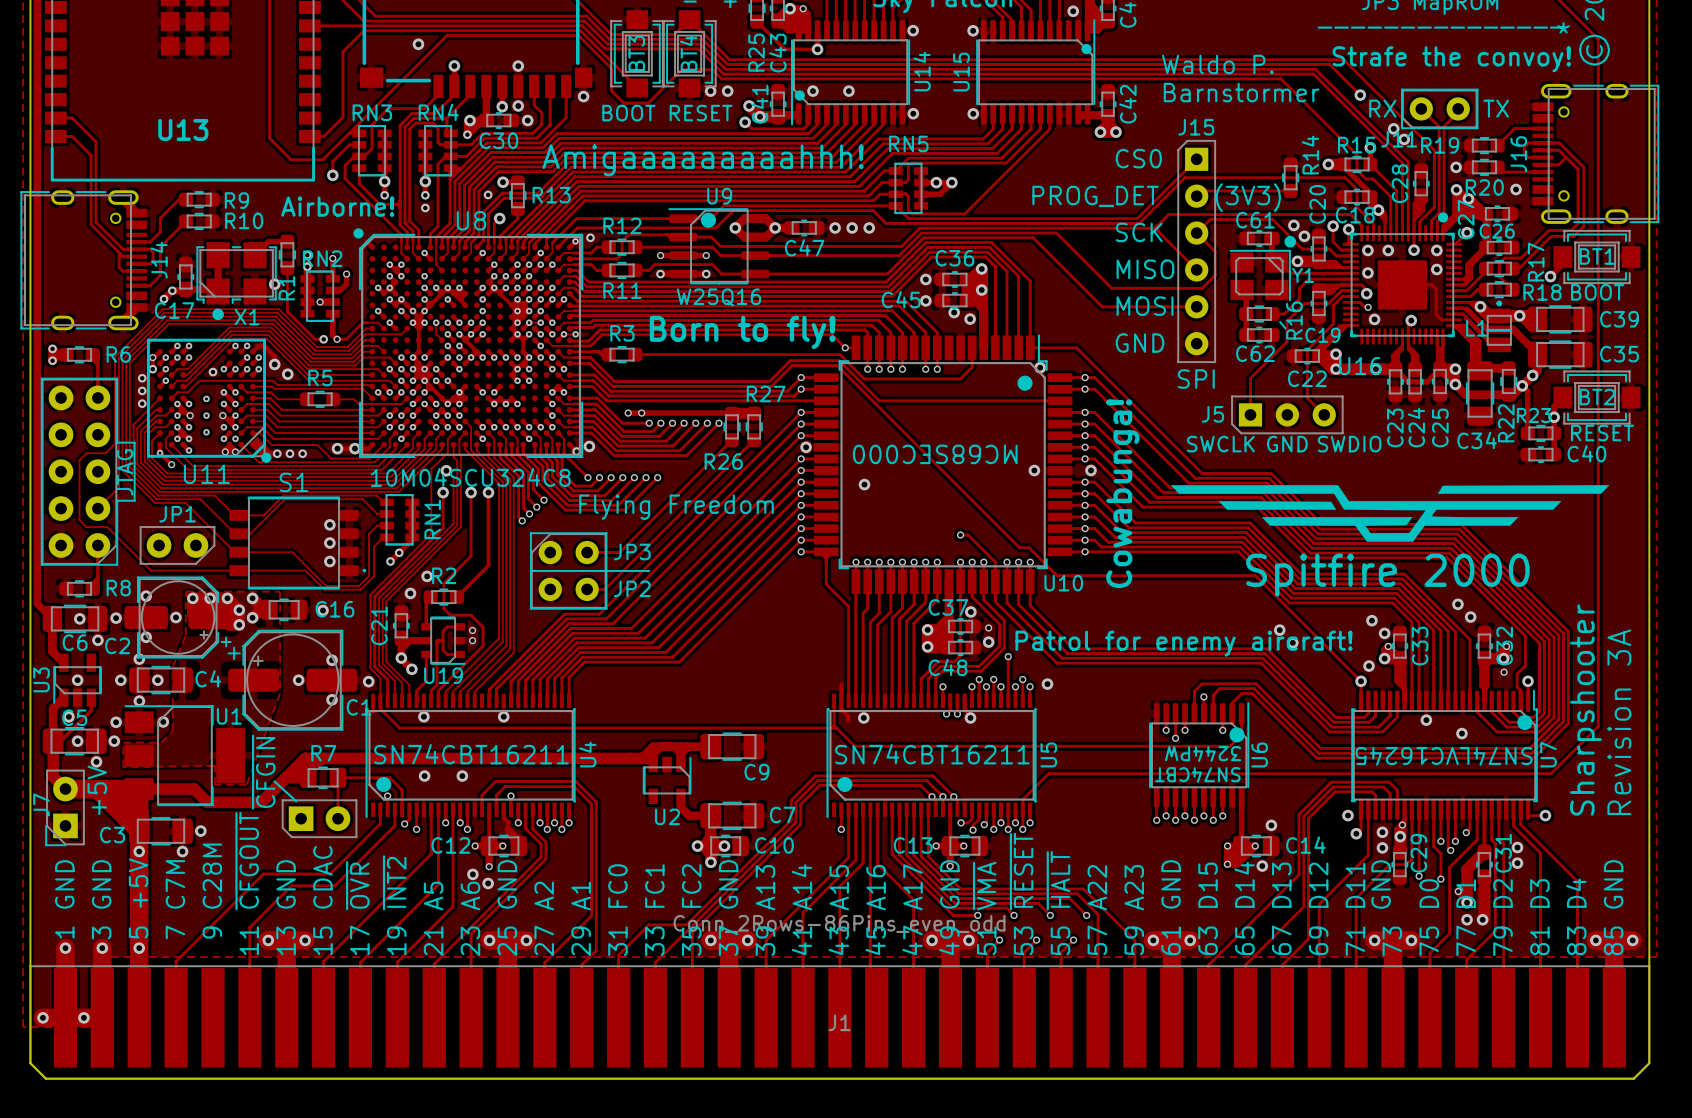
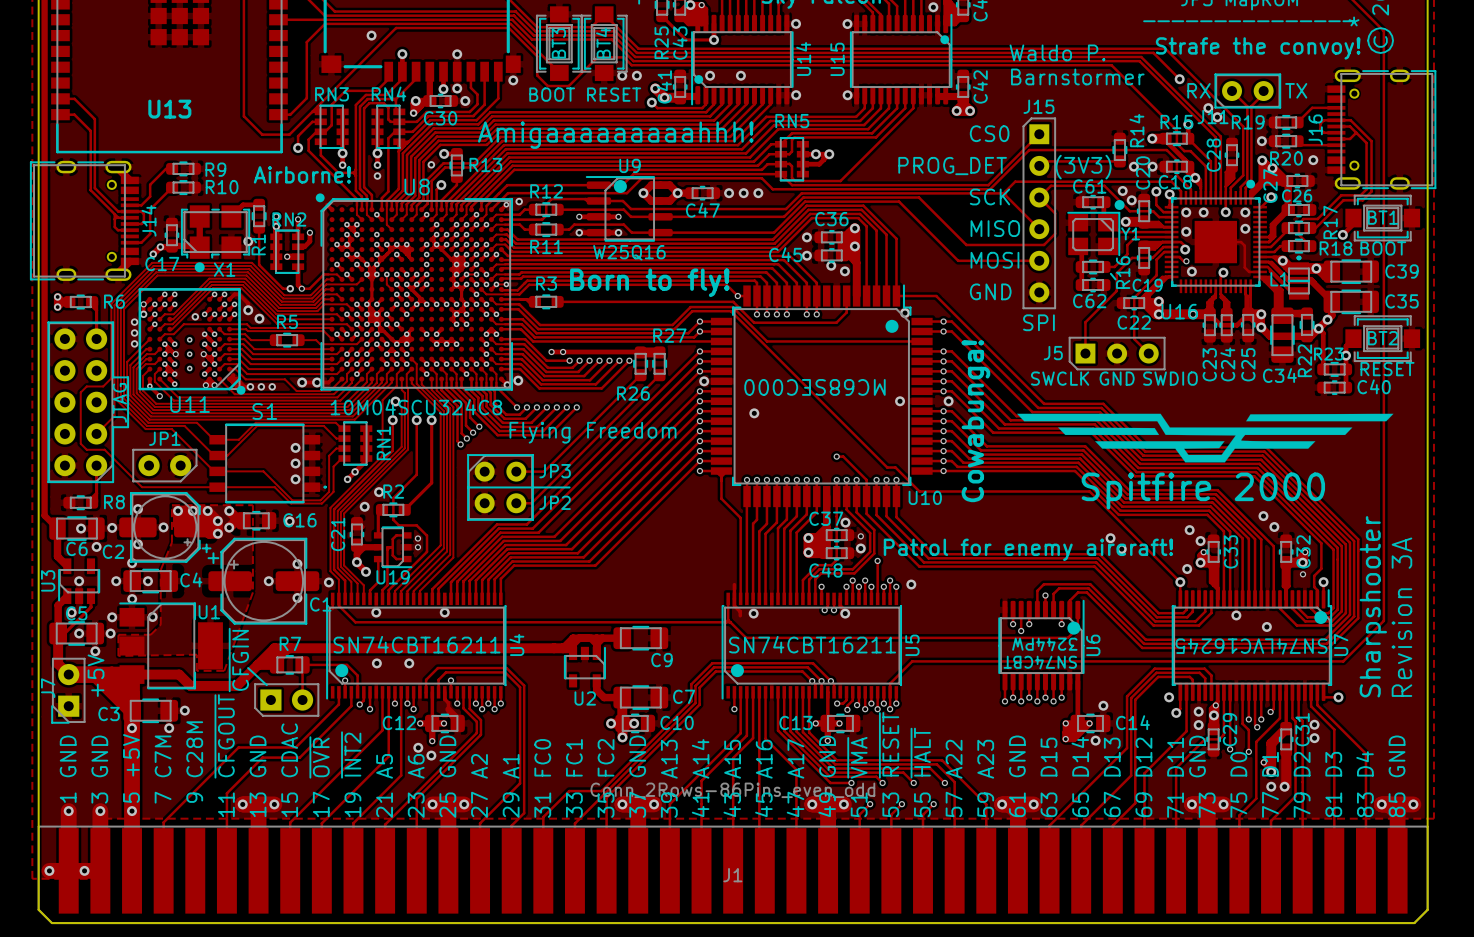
via: none -> (1133, 166)
via: none -> (1152, 166)

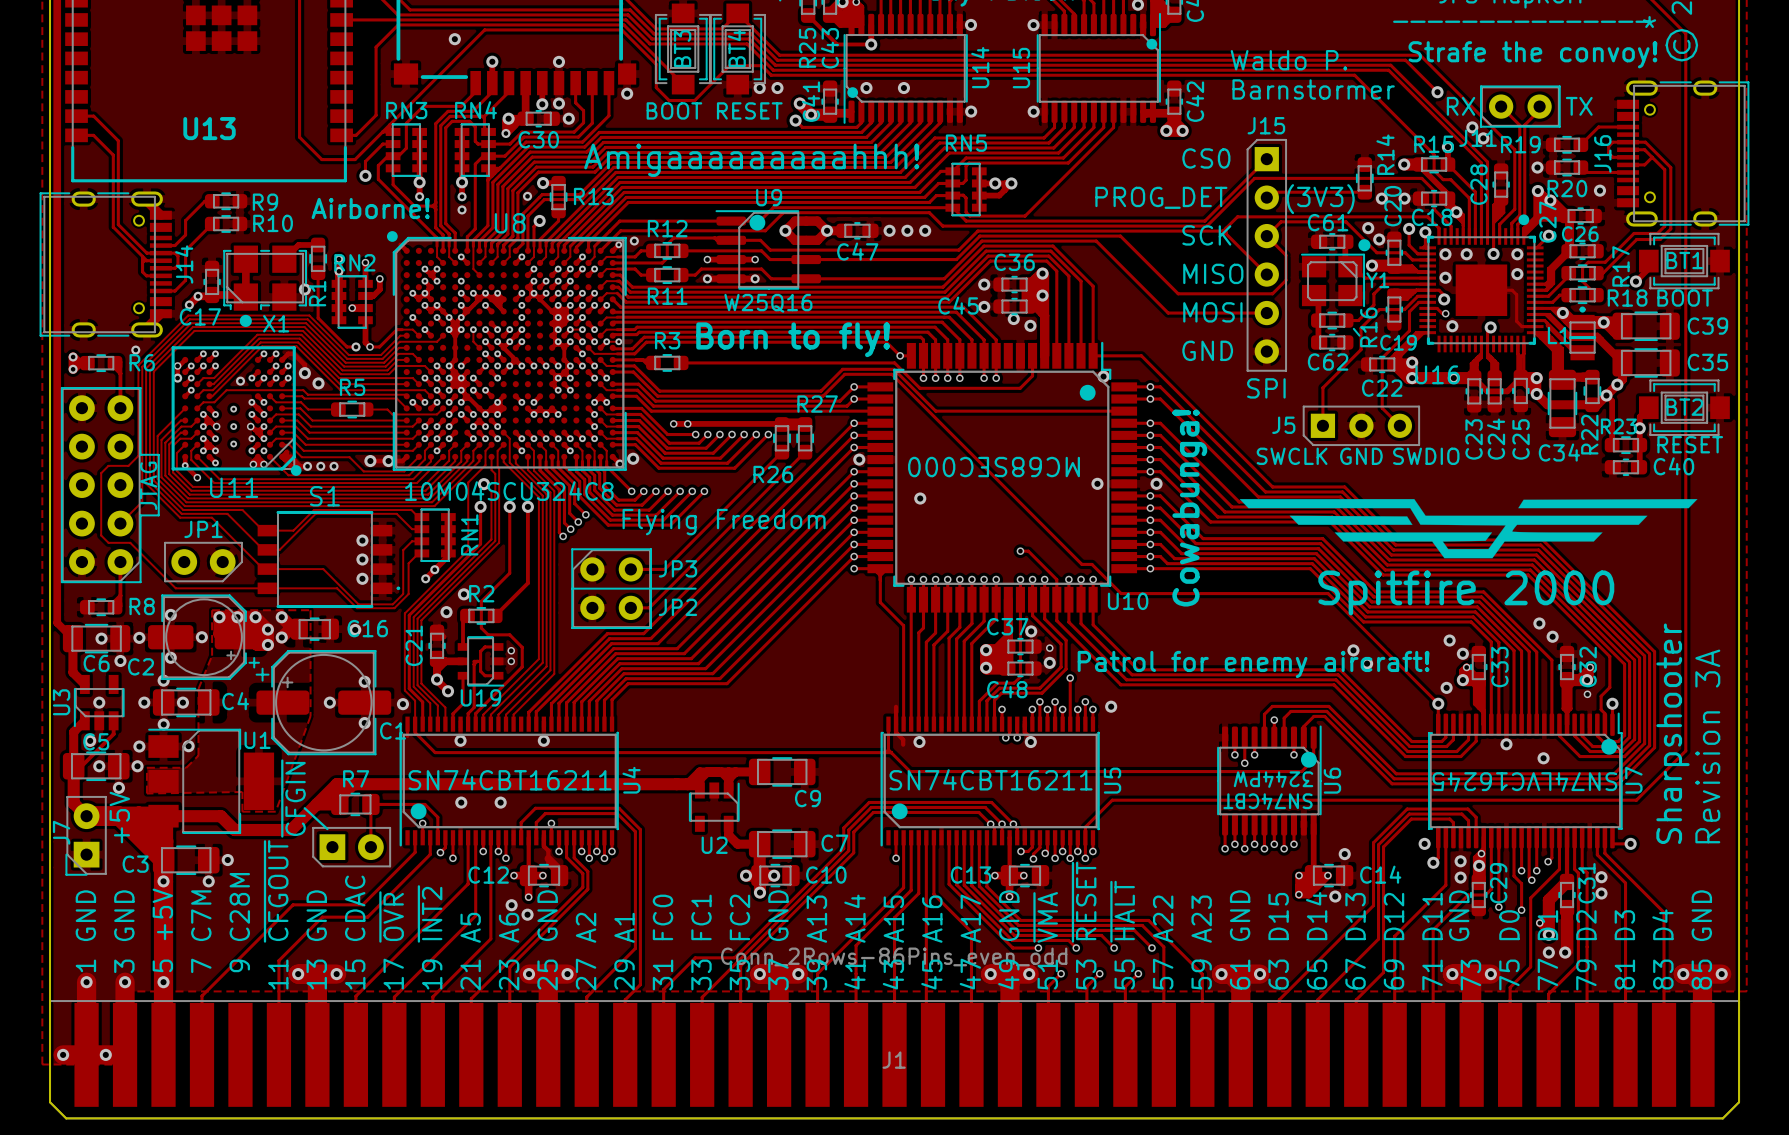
via: none -> (135, 350)
via: (134, 322) -> none
via: (134, 332) -> none
via: (134, 343) -> none

